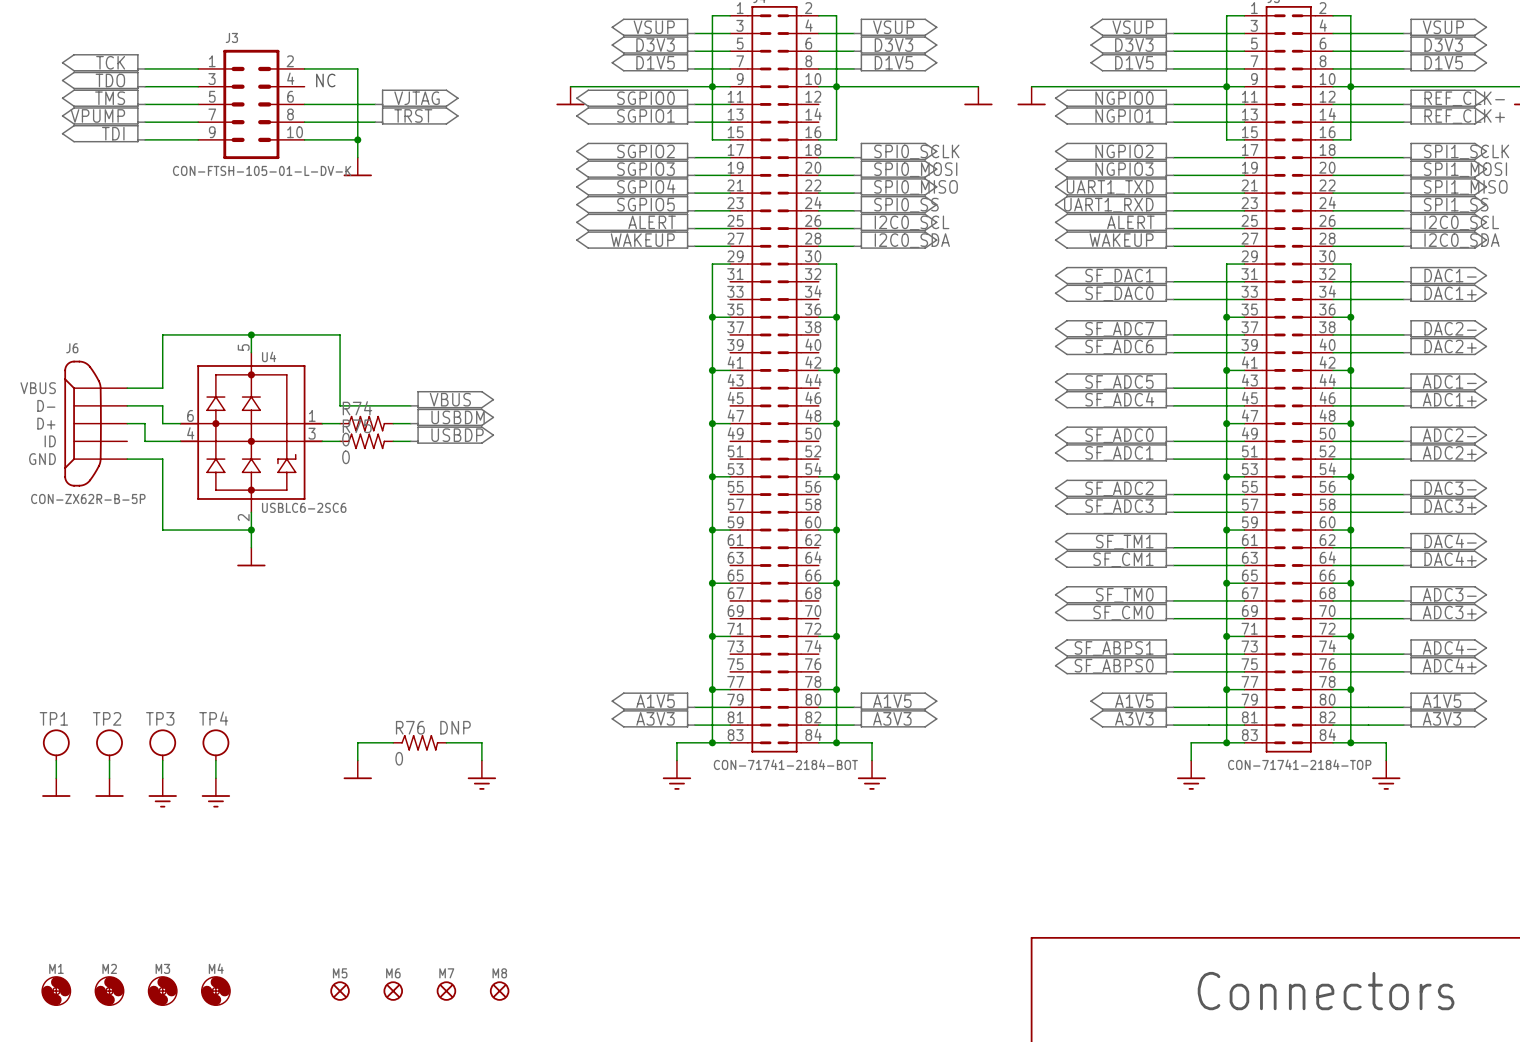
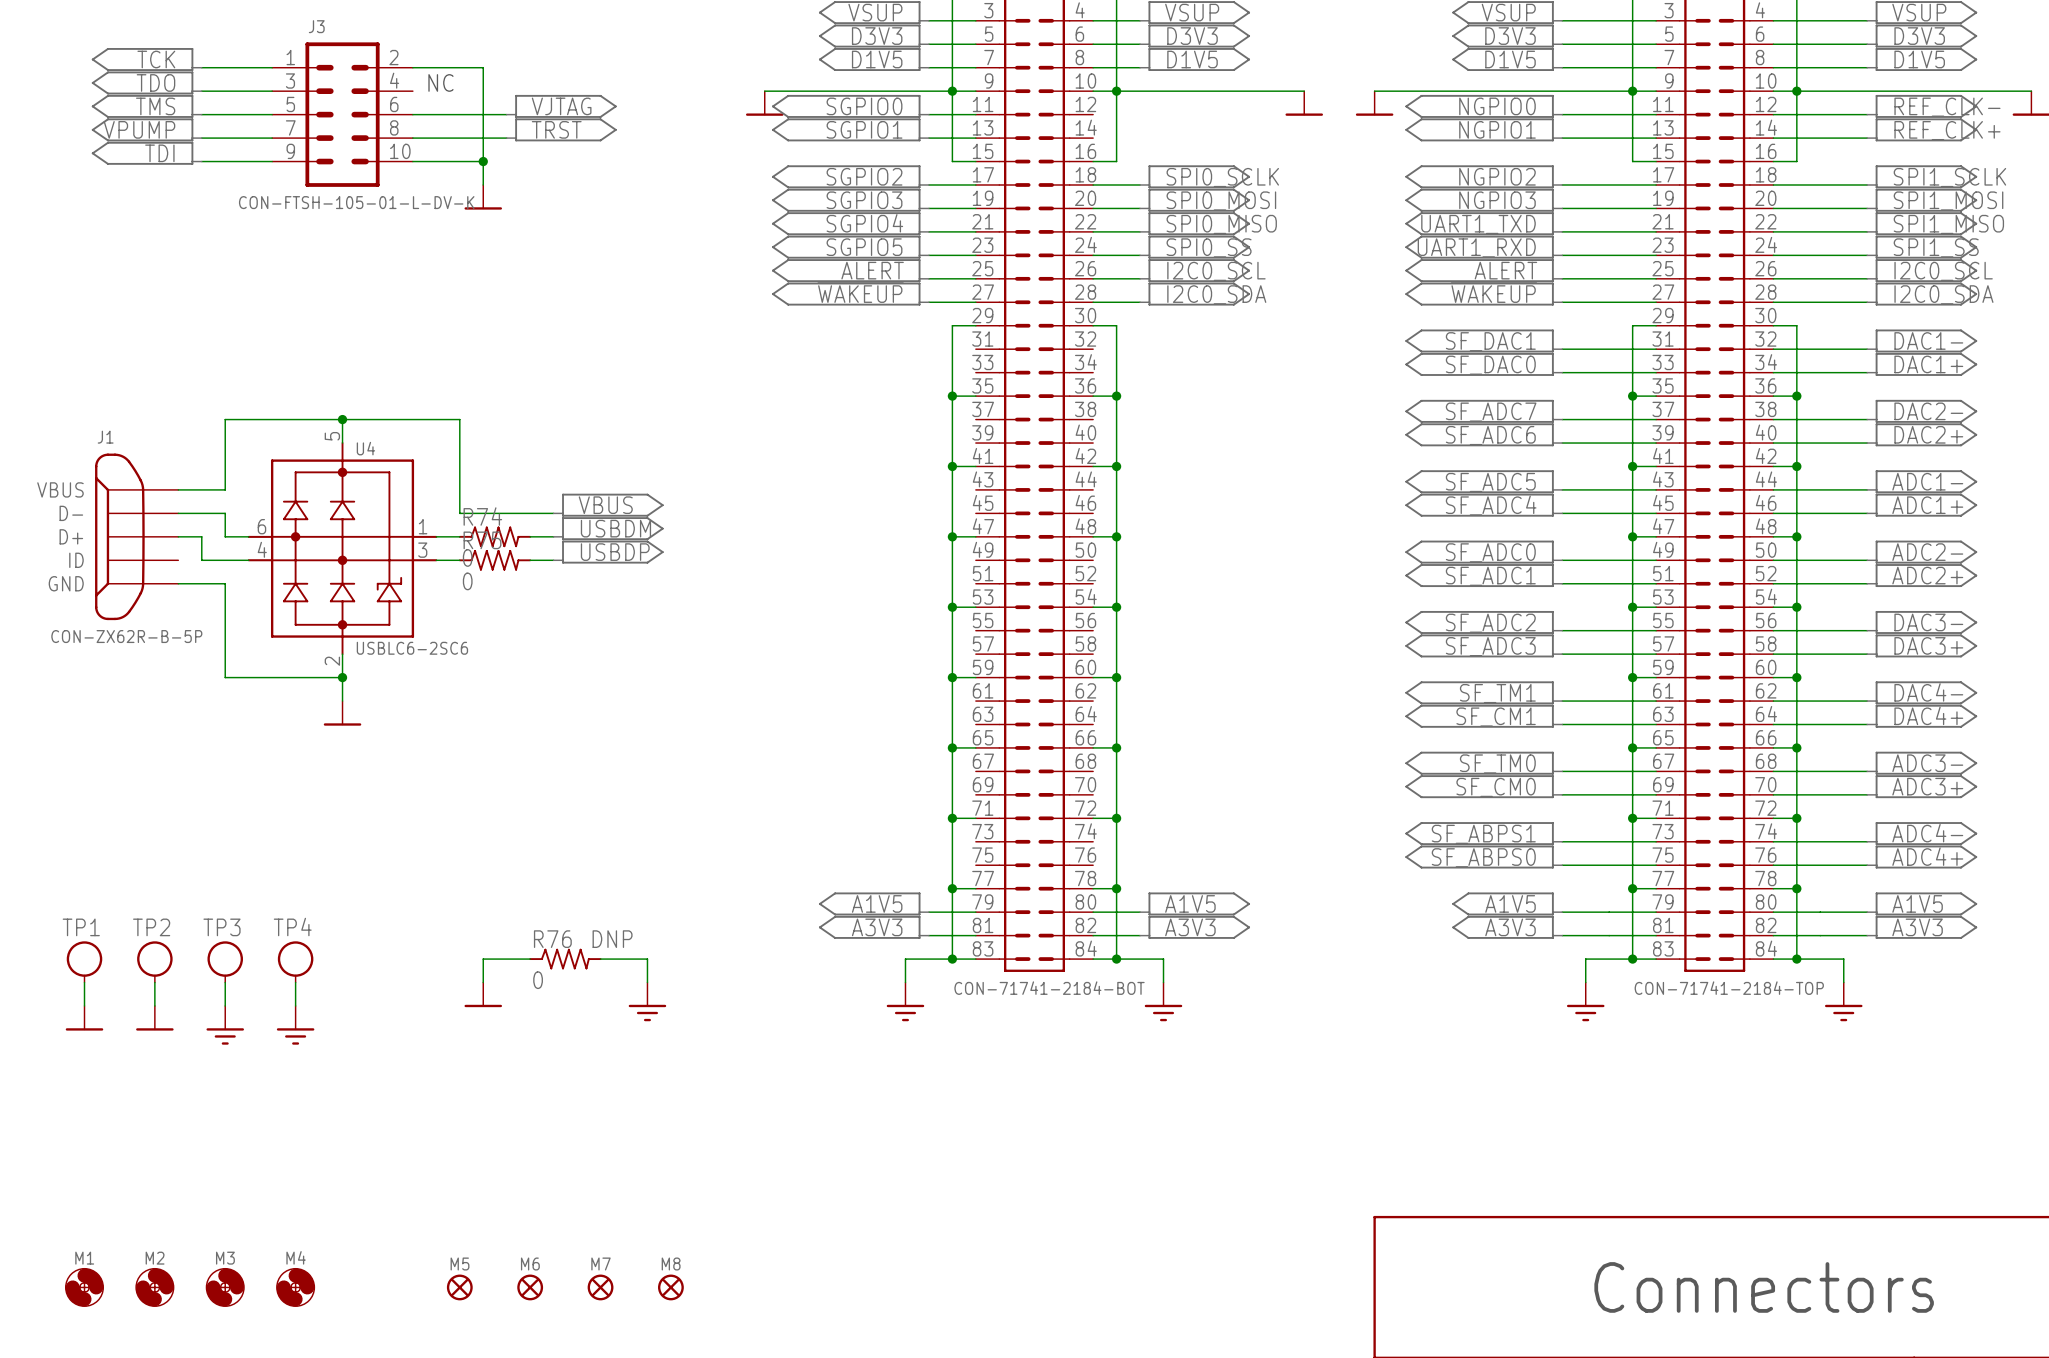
J6 name: J6 (72, 348) -> J1 (105, 437)

